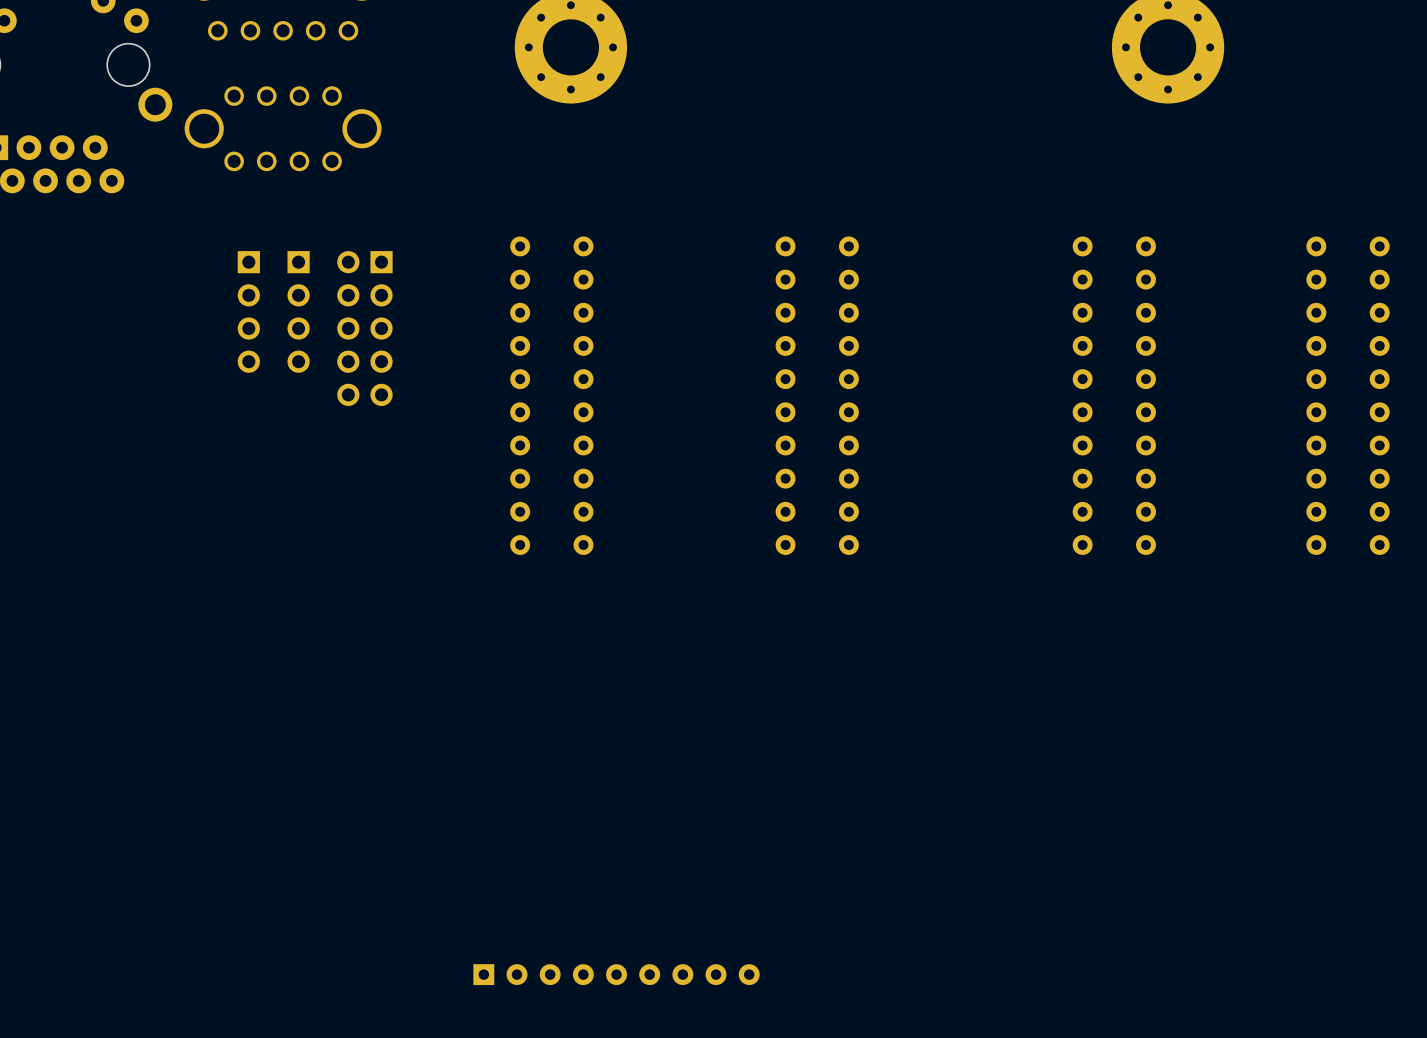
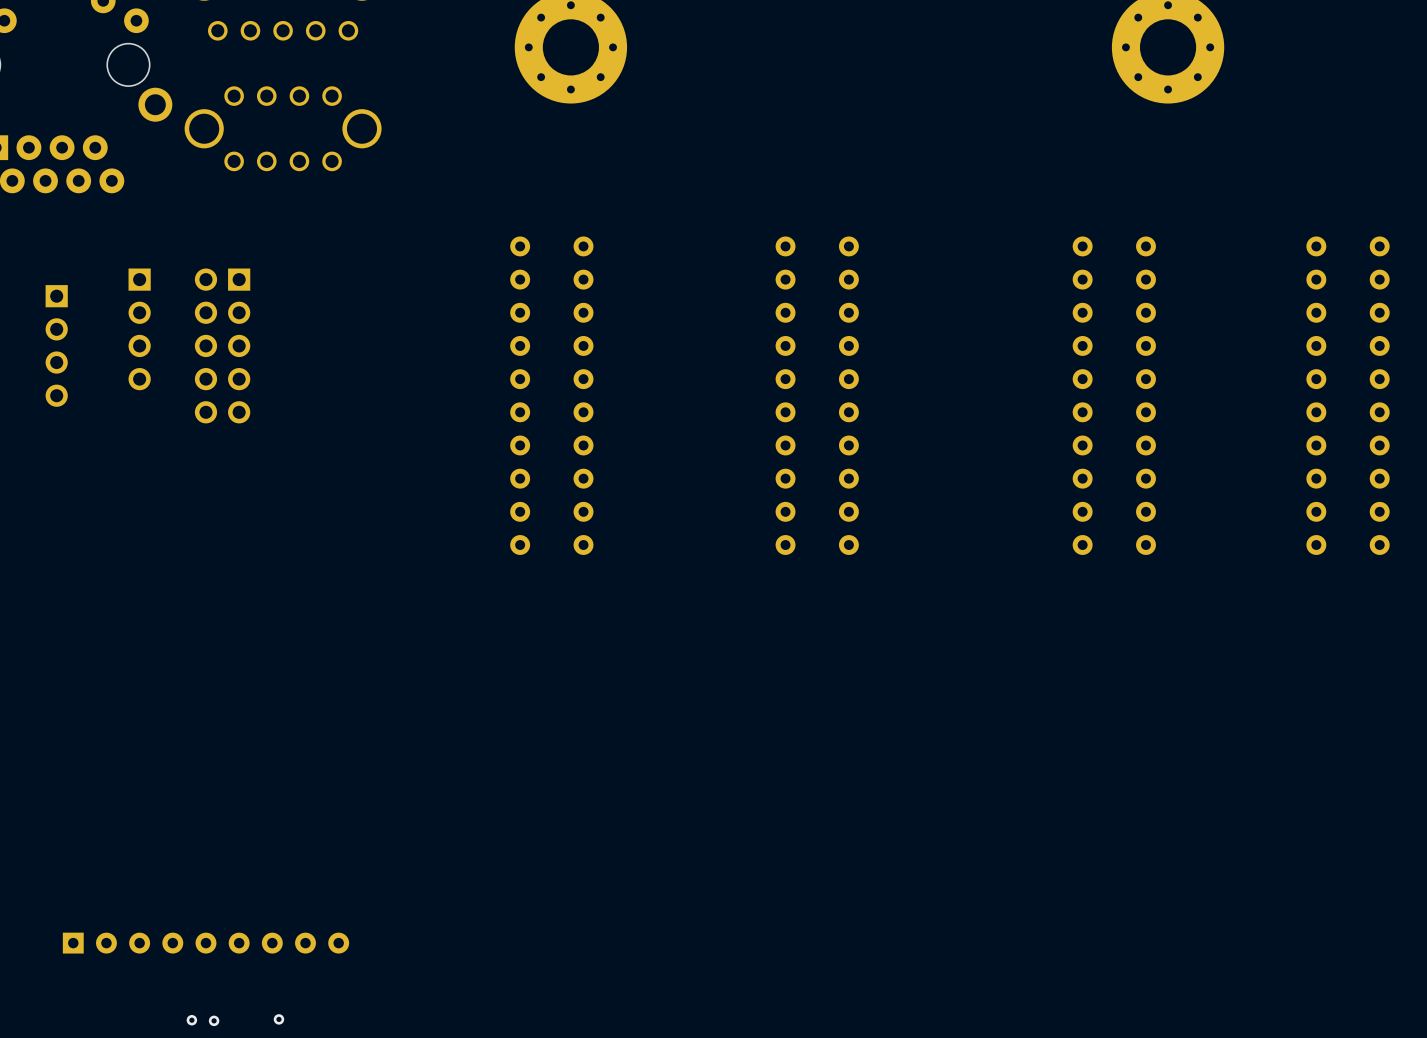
part: (248, 311) -> none
part: (298, 311) -> none
part position: (364, 328) -> (222, 345)
part: none -> (139, 329)
part: none -> (56, 345)
part: none -> (205, 943)
part: (616, 974) -> none
via: none -> (278, 1019)
via: none -> (191, 1020)
via: none -> (214, 1020)

